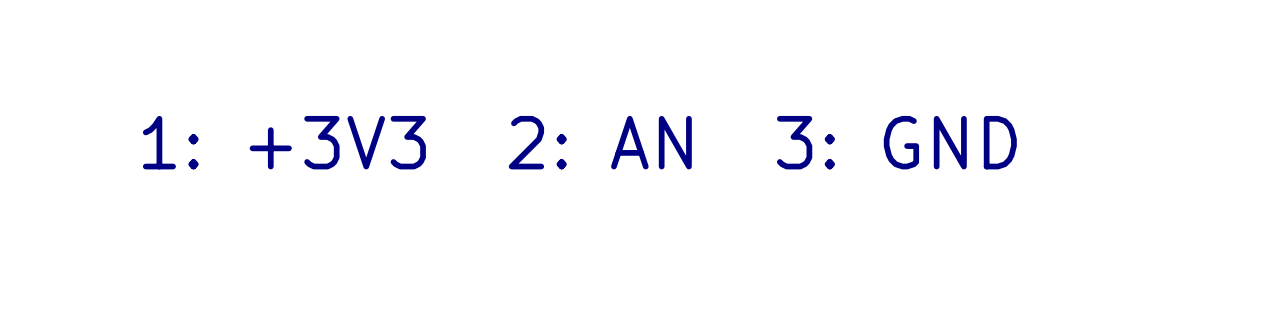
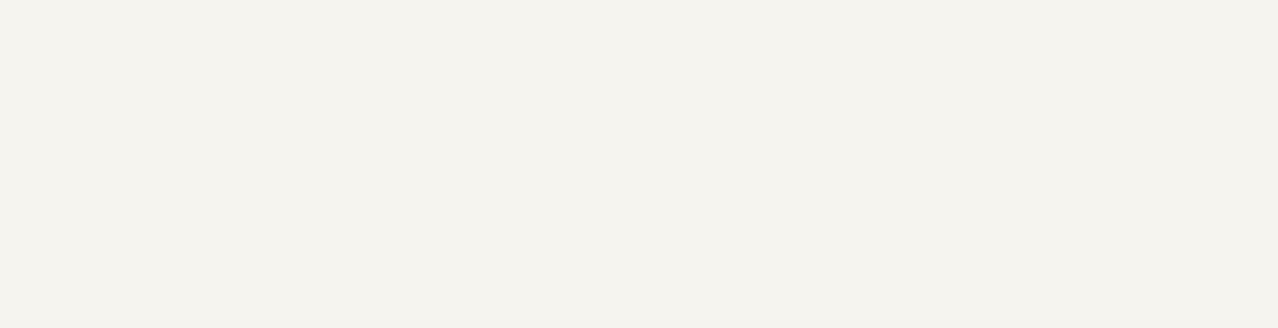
text: 1: +3V3 2: AN 3: GND (579, 142) -> none

